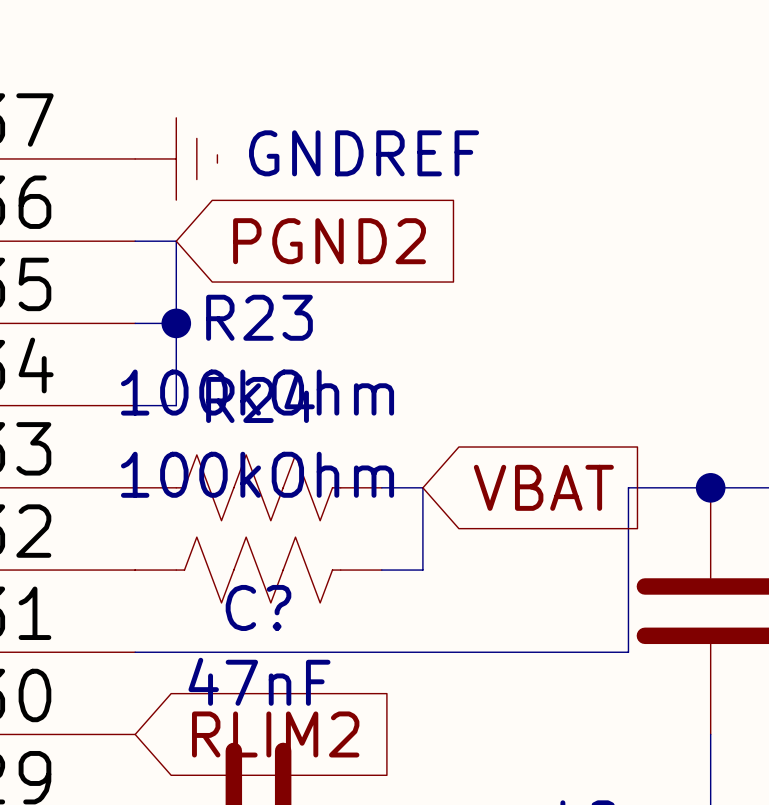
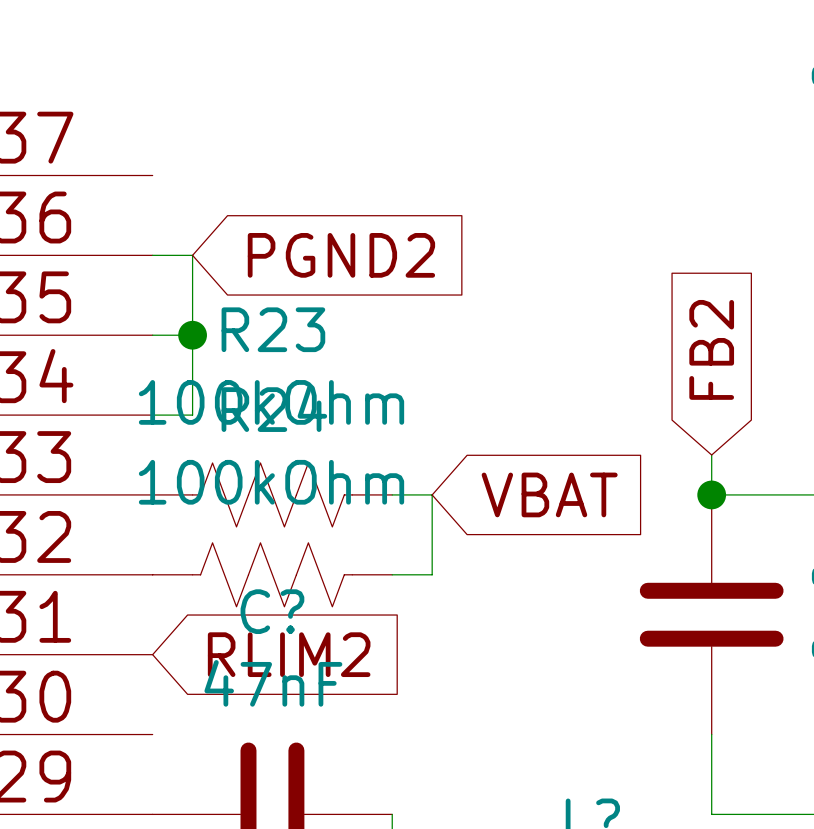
power symbol: GNDREF (176, 158) -> none
global label: none -> FB2 (711, 349)
wire: (710, 487) (628, 487) (628, 652) (135, 652) -> (711, 494) (711, 455)
global label position: RLIM2 (275, 734) -> RLIM2 (289, 654)

